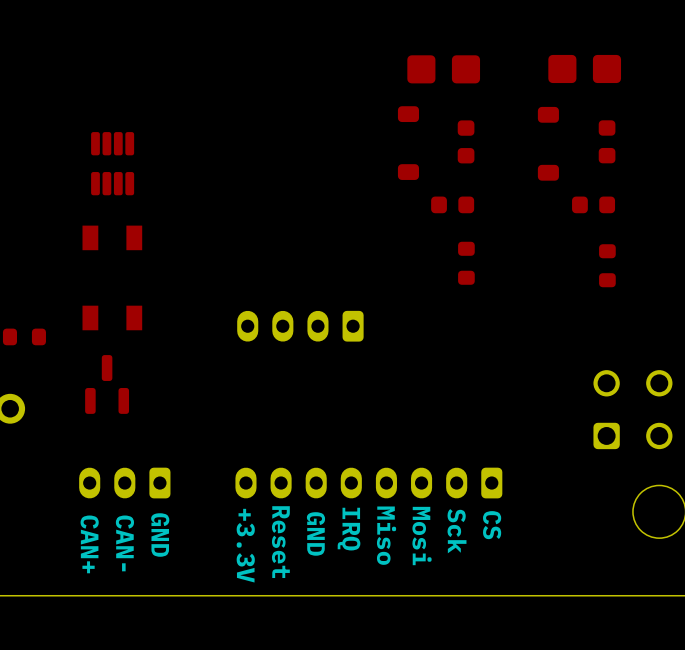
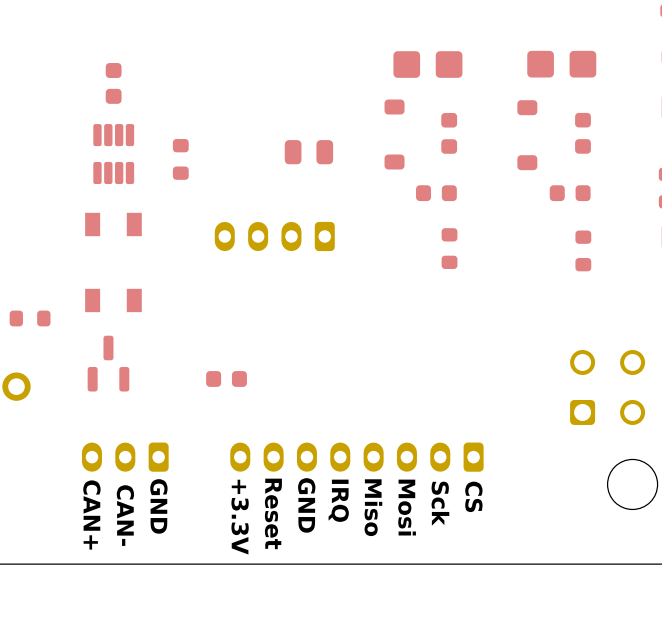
part: none -> (113, 83)
part: none -> (308, 152)
part: none -> (180, 159)
part position: (300, 326) -> (274, 236)
part: none -> (226, 378)

